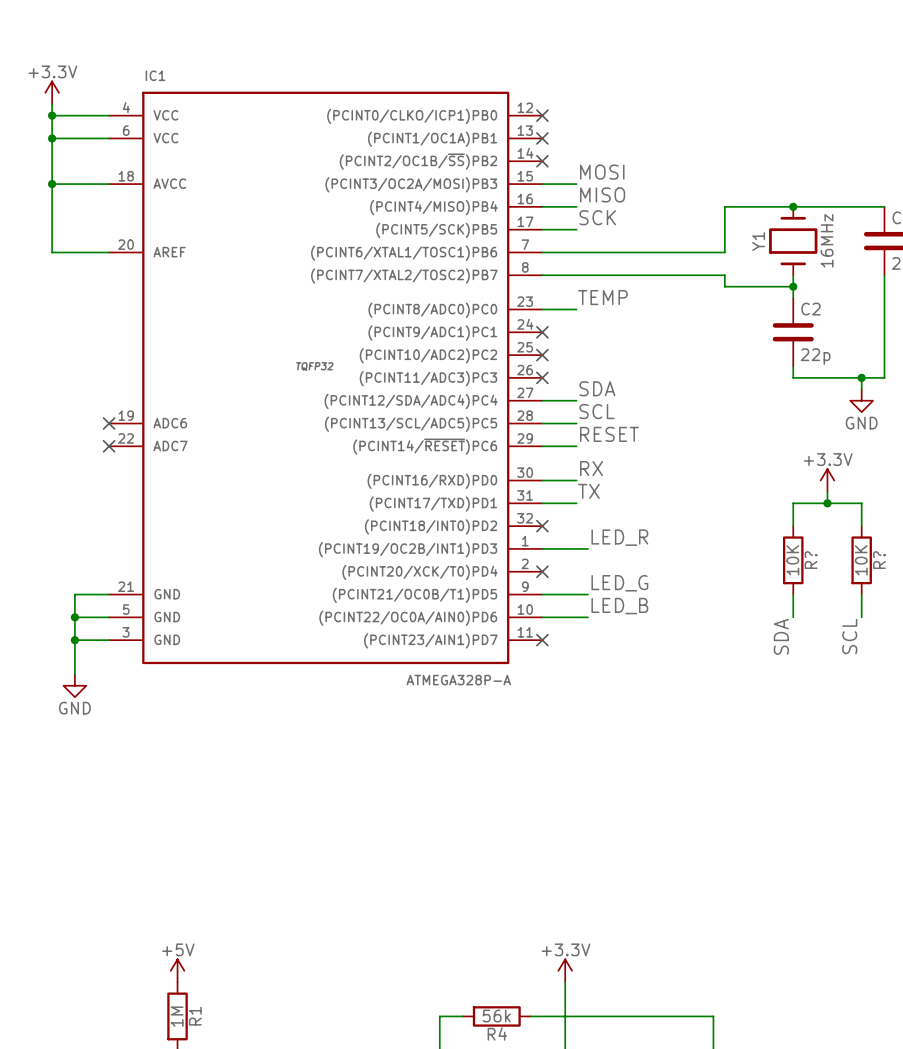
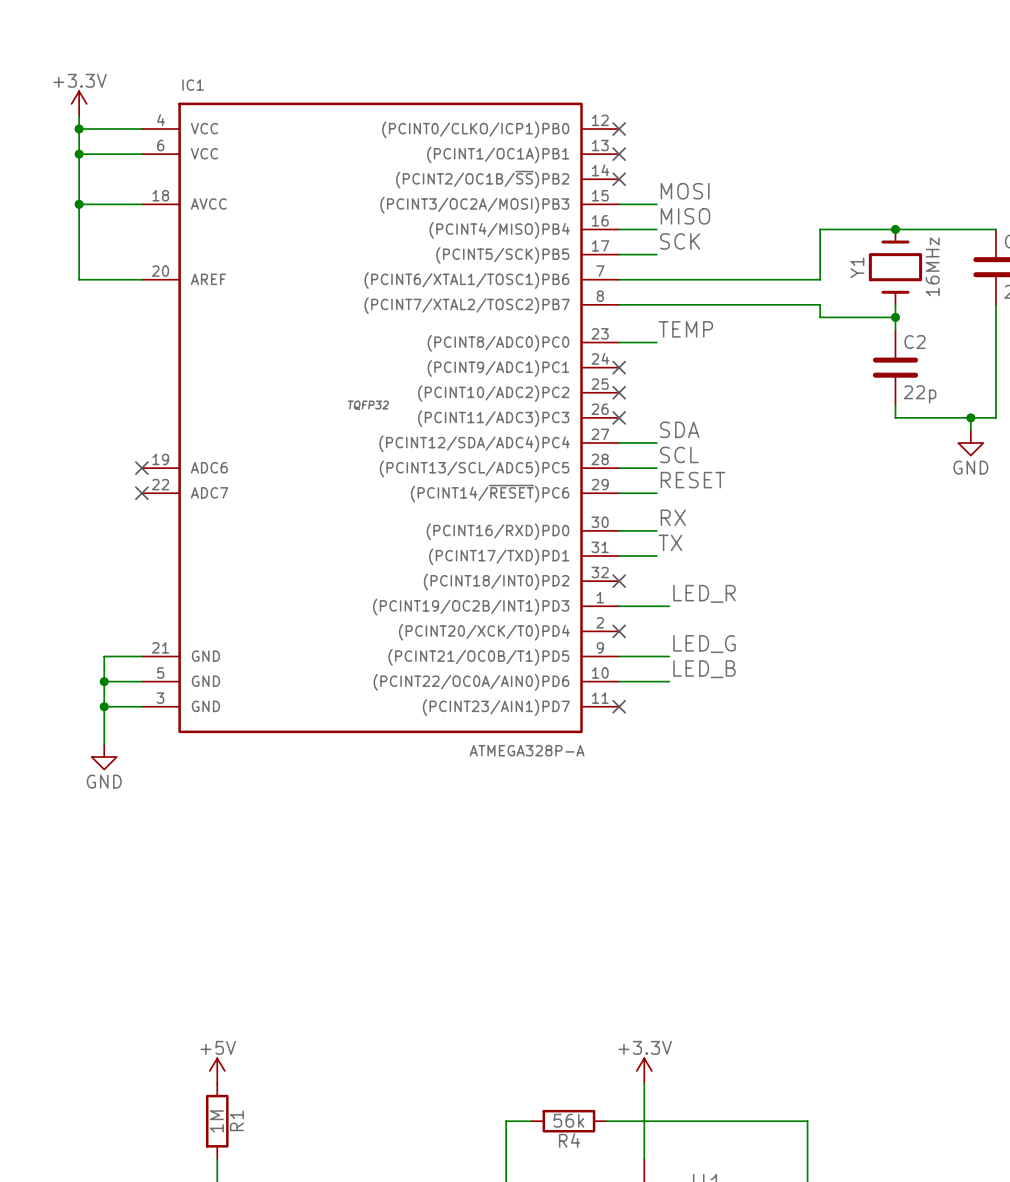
power symbol: +3.3V (827, 480) -> none
wire: (827, 491) (827, 503) -> none
junction: (827, 503) -> none
wire: (793, 526) (793, 503) (861, 503) (861, 526) -> none
R?: 10K (793, 560) -> none
R?: 10K (861, 560) -> none
wire: (793, 594) (793, 617) -> none
wire: (861, 594) (861, 617) -> none
label: SDA (781, 636) -> none
label: SCL (849, 636) -> none

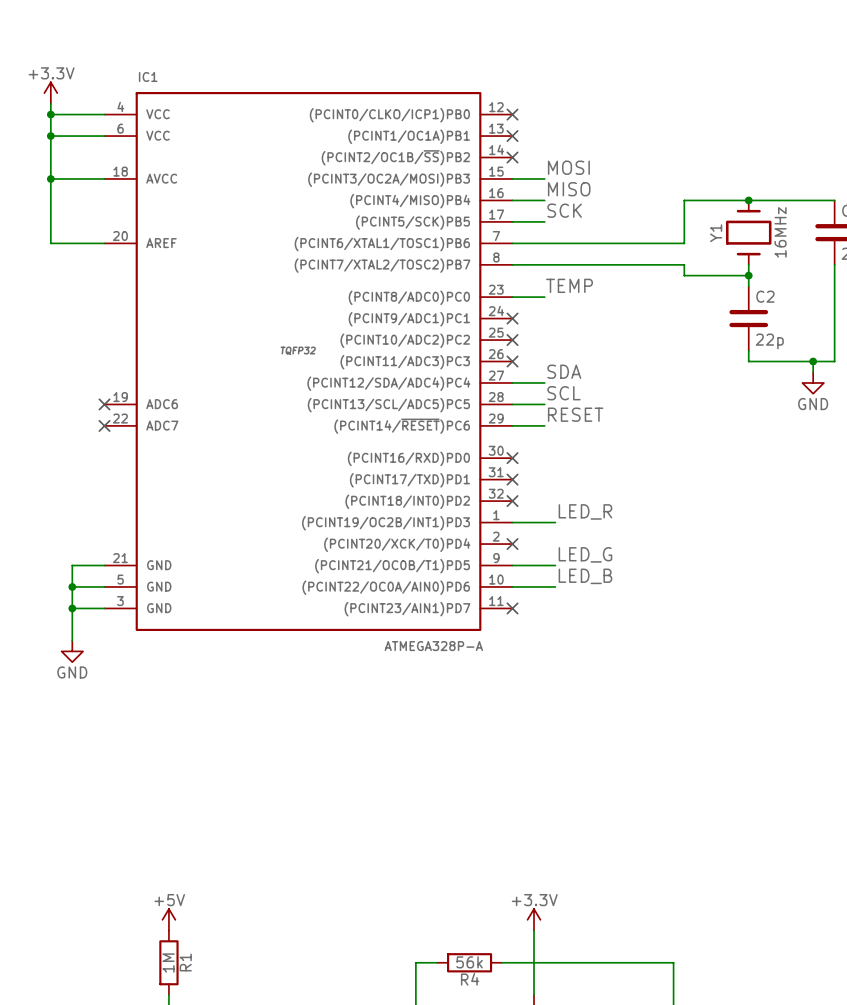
label: RX (673, 517) -> none
wire: (619, 530) (656, 530) -> none
no-connect mark: none -> (512, 458)
label: TX (670, 542) -> none
wire: (619, 556) (656, 556) -> none
no-connect mark: none -> (512, 479)

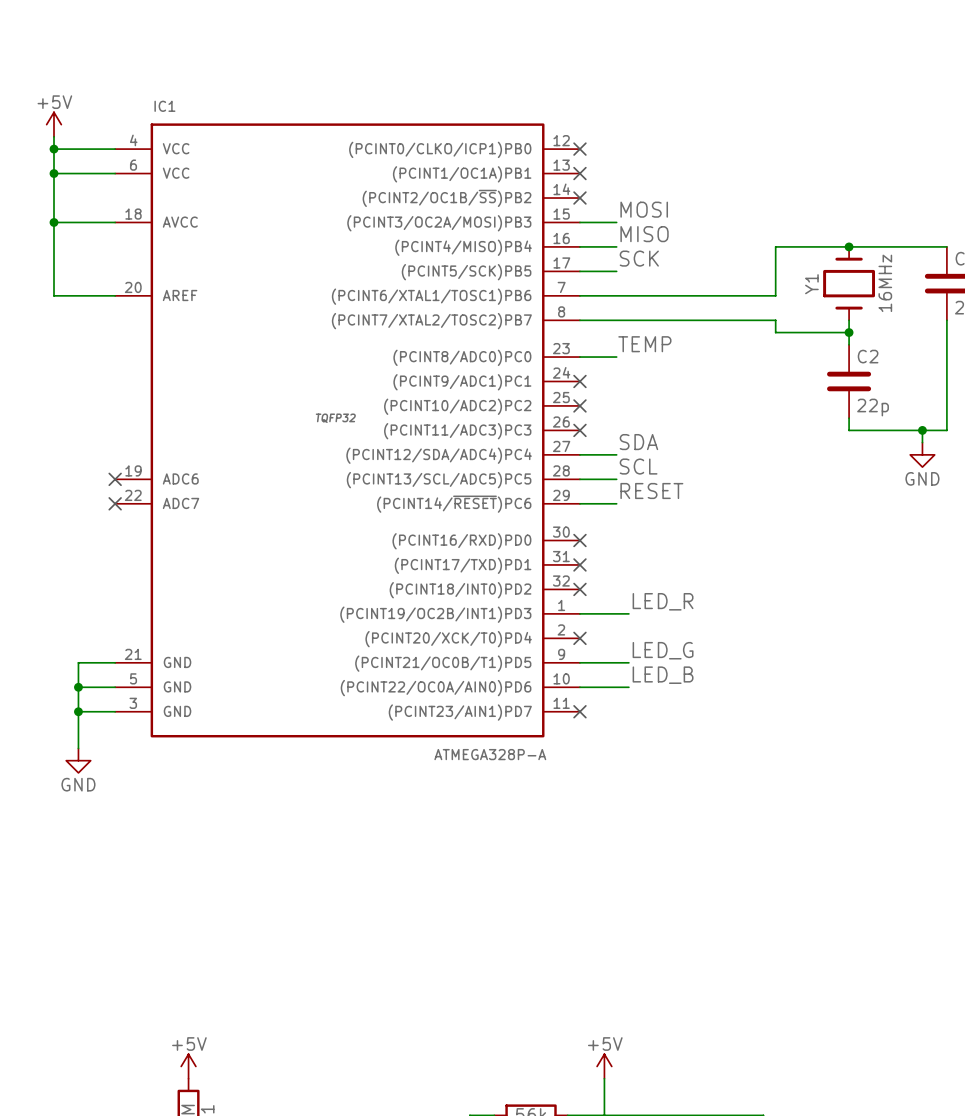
power symbol: +3.3V (50, 93) -> +5V (53, 124)
power symbol: +3.3V (534, 919) -> +5V (604, 1066)

